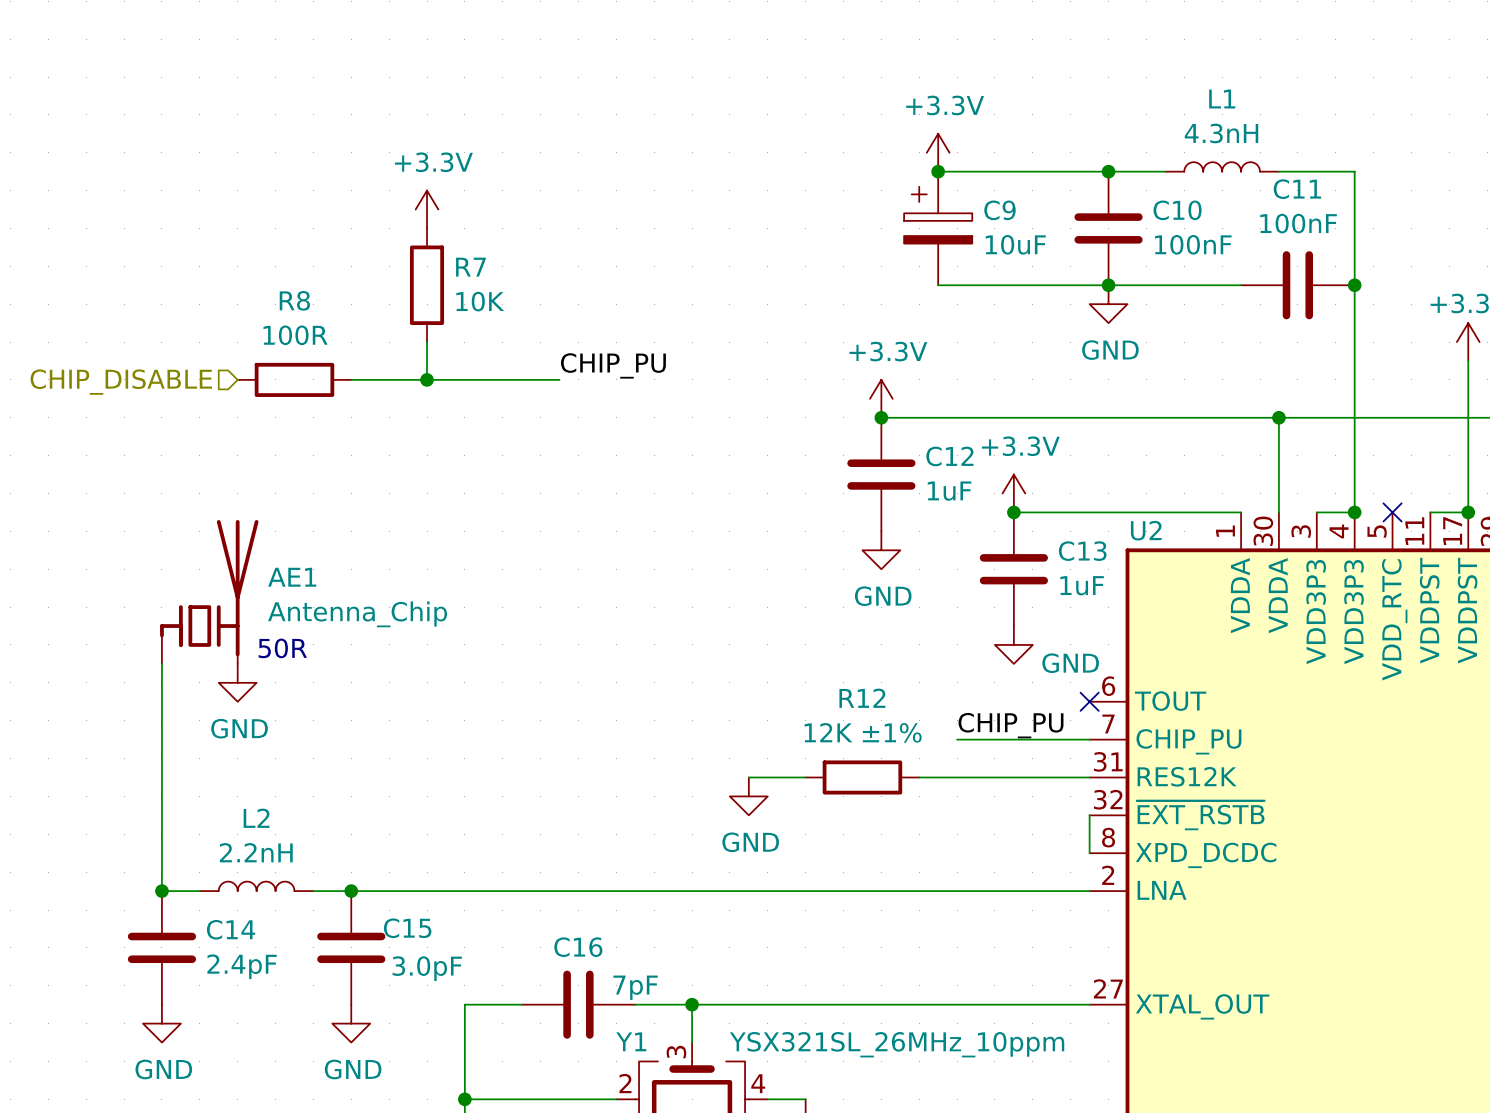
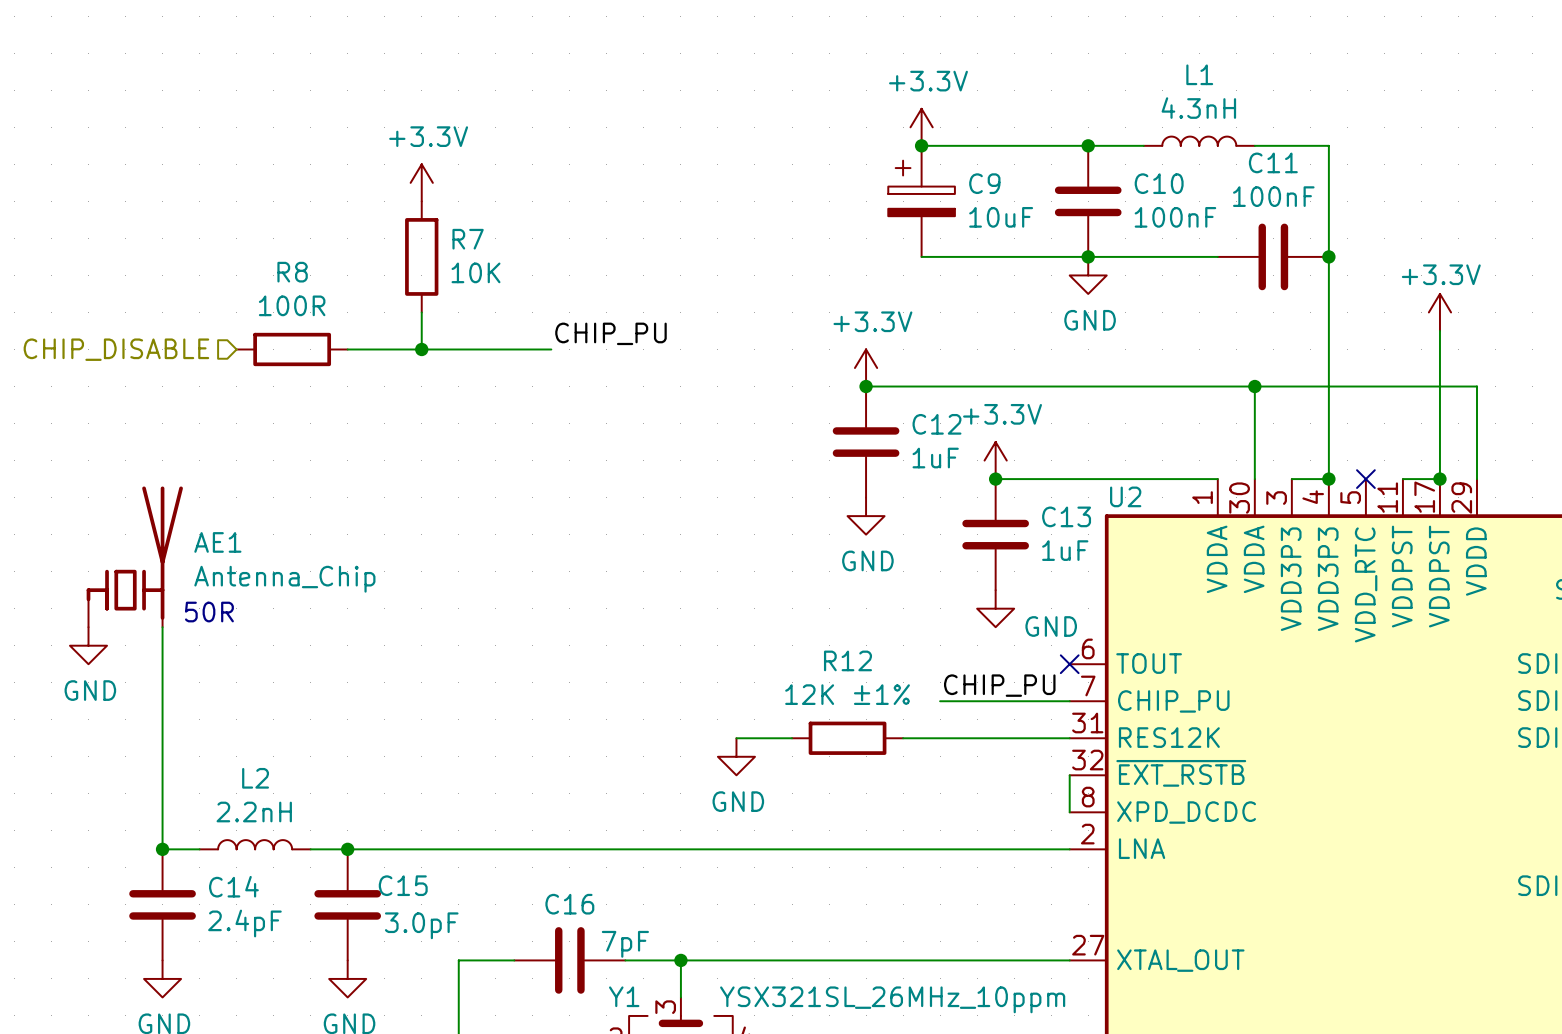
AE1 position: (209, 591) -> (134, 556)
text position: 50R (282, 648) -> 50R (209, 612)
power symbol position: GND (237, 682) -> GND (88, 645)

